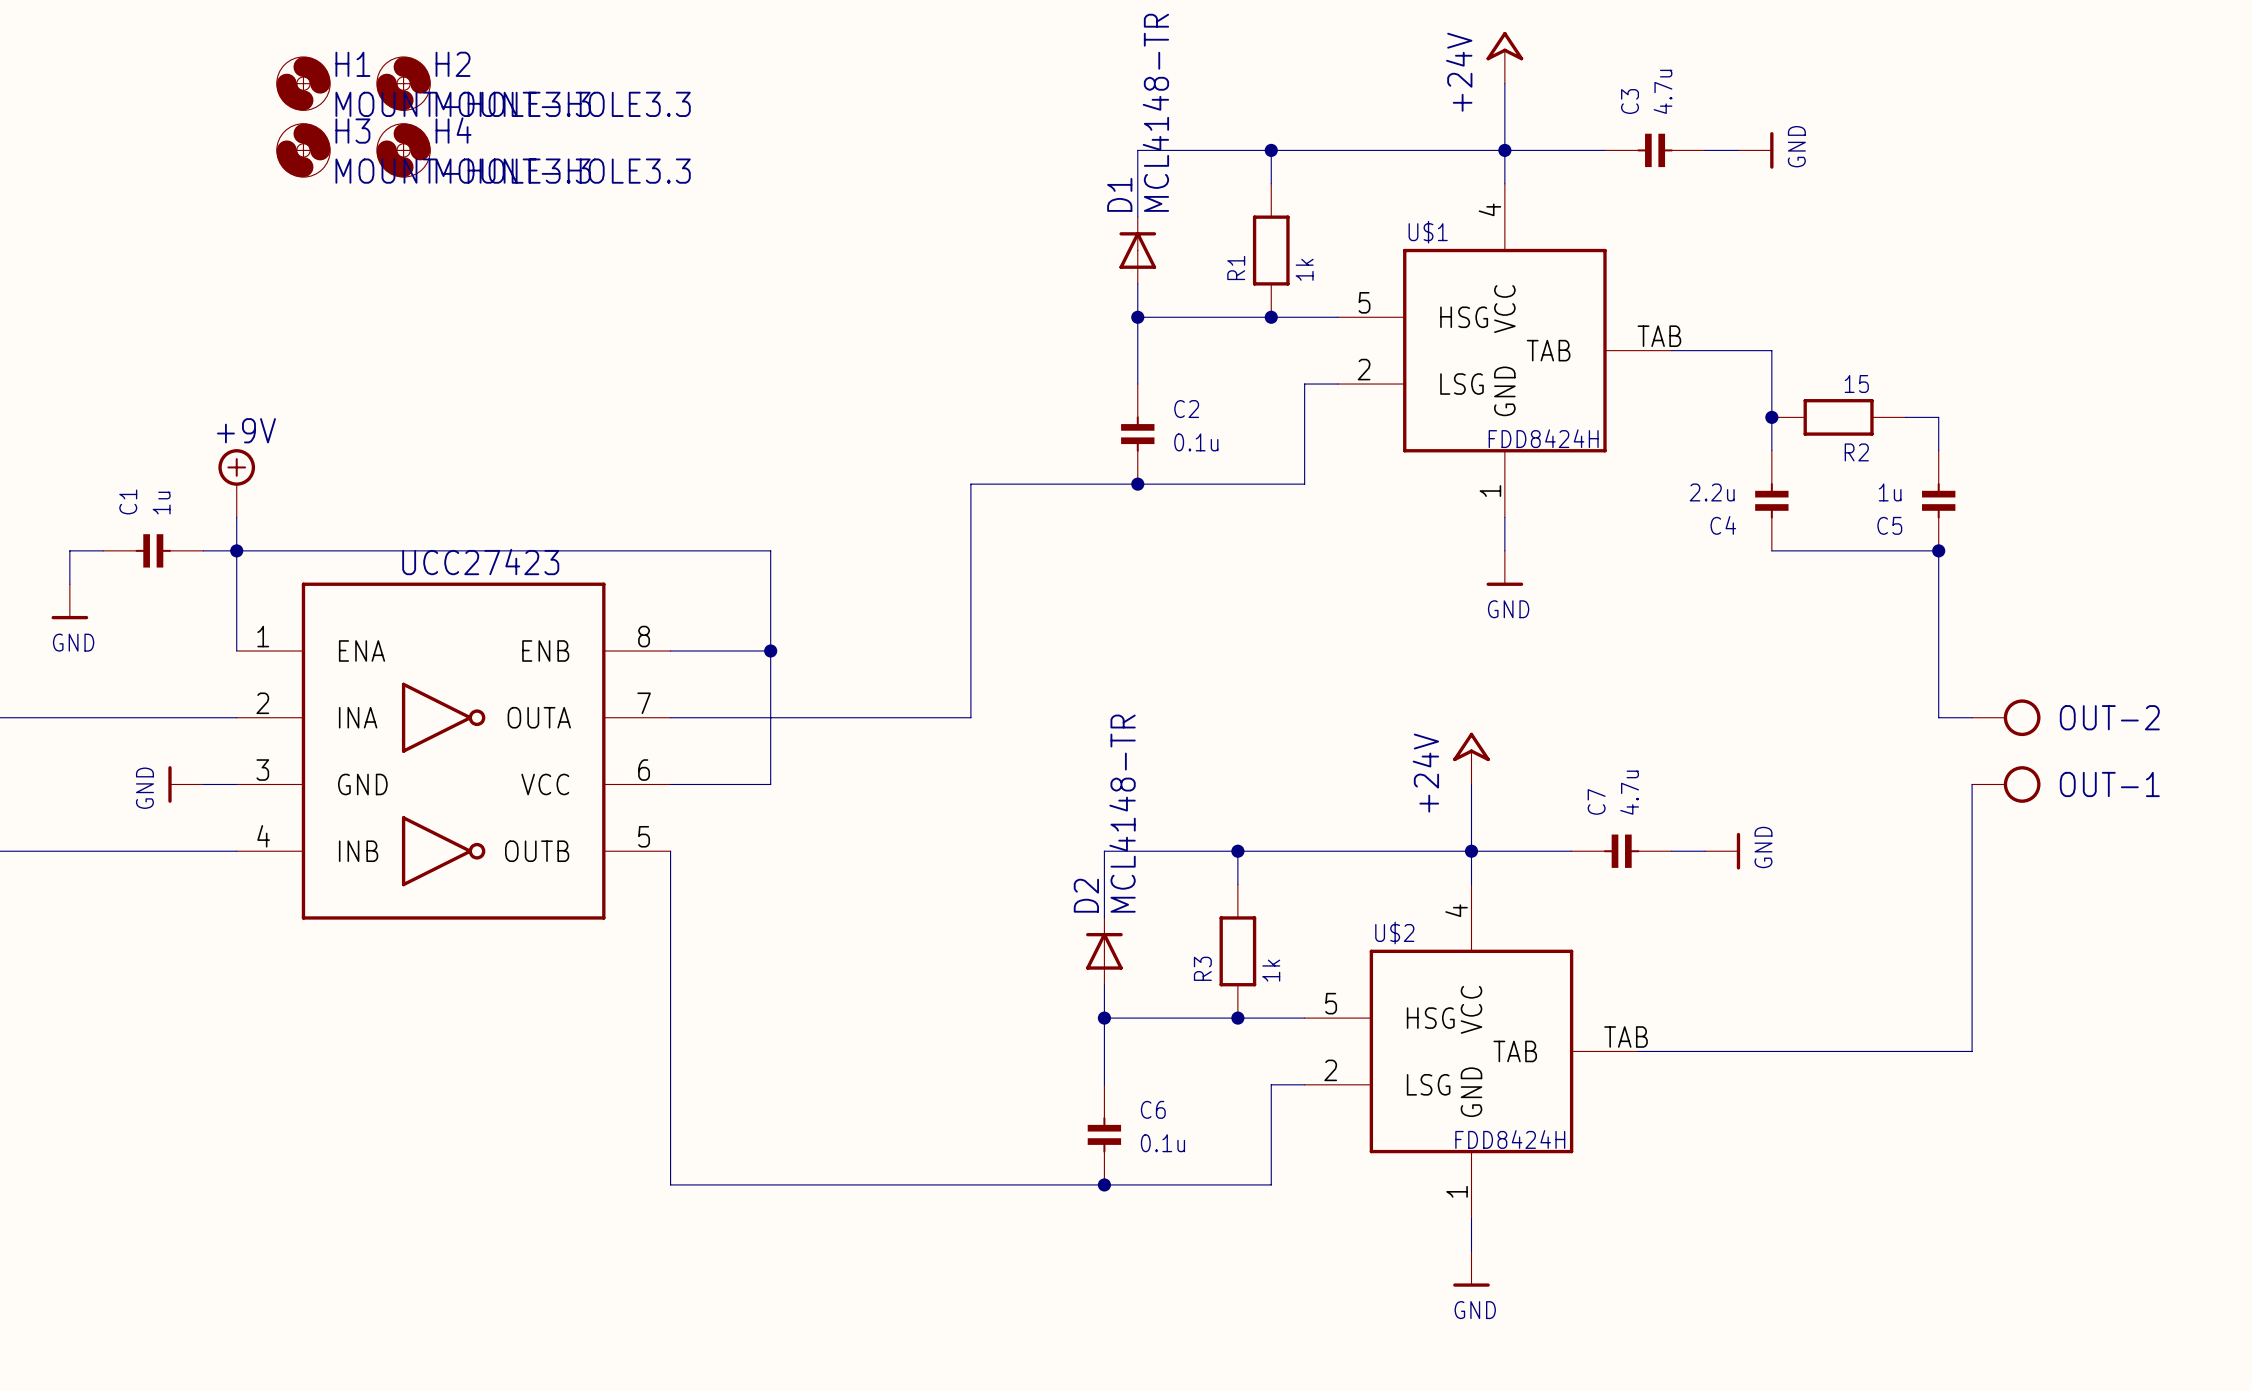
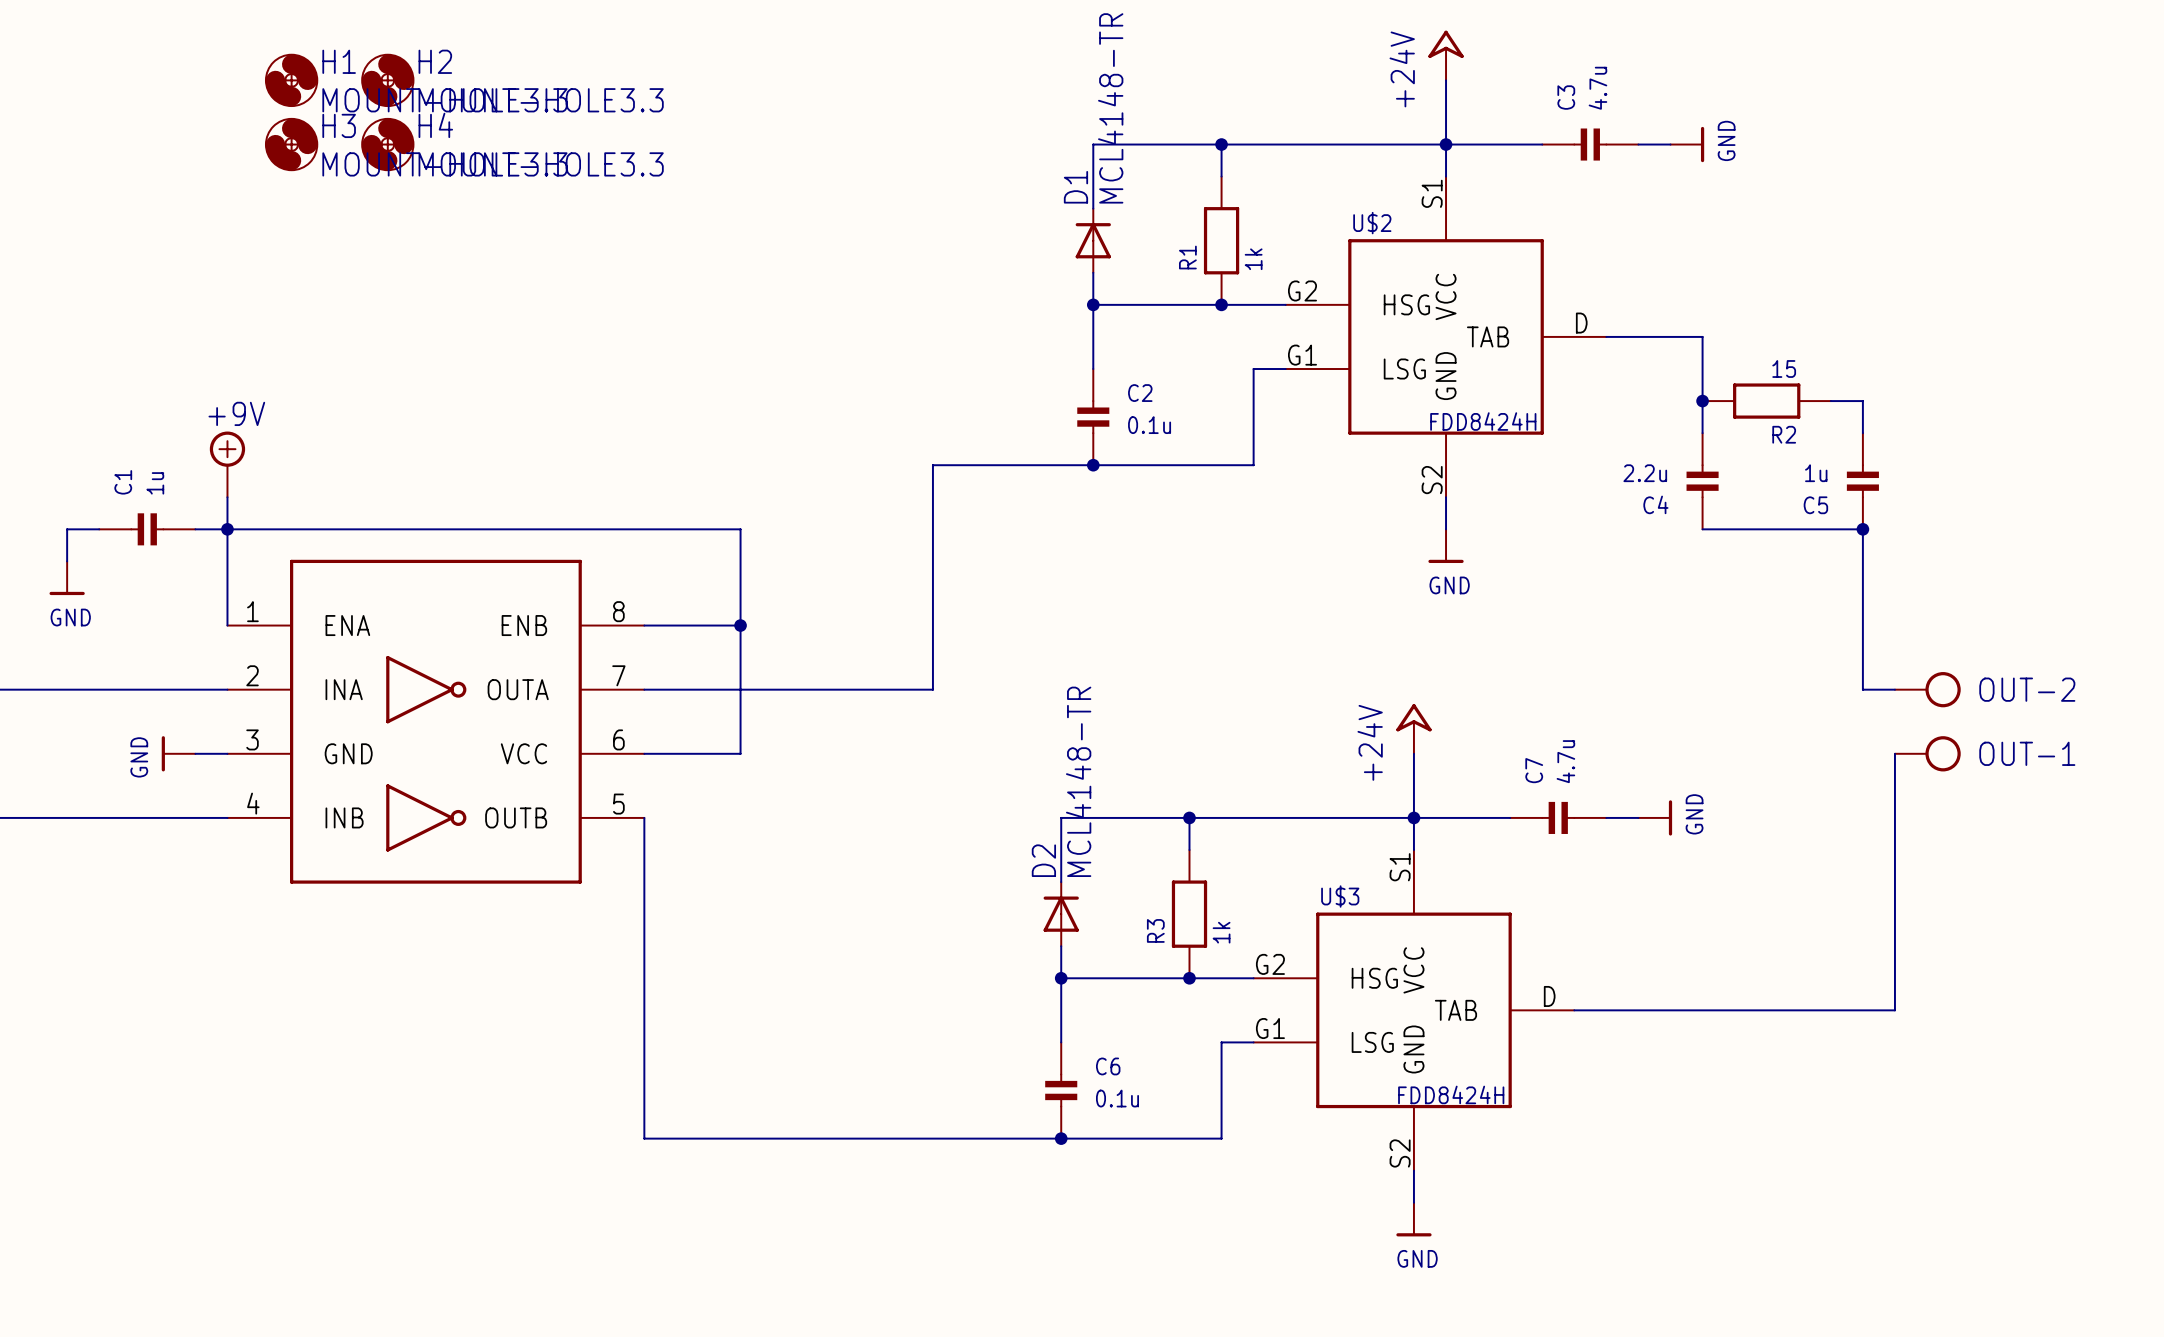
U$1: (1504, 350) -> none
part value: UCC27423 (480, 562) -> none
U$2 pin number: 4 (1456, 910) -> S1 (1432, 193)
U$2 pin number: 5 (1331, 1003) -> G2 (1302, 290)
U$2 pin number: TAB (1626, 1037) -> D (1581, 323)
U$2 position: (1471, 1051) -> (1446, 336)
U$3: none -> (1413, 1010)
U$2 pin number: 2 (1330, 1070) -> G1 (1302, 355)
U$2 pin number: 1 (1457, 1191) -> S2 (1432, 480)

